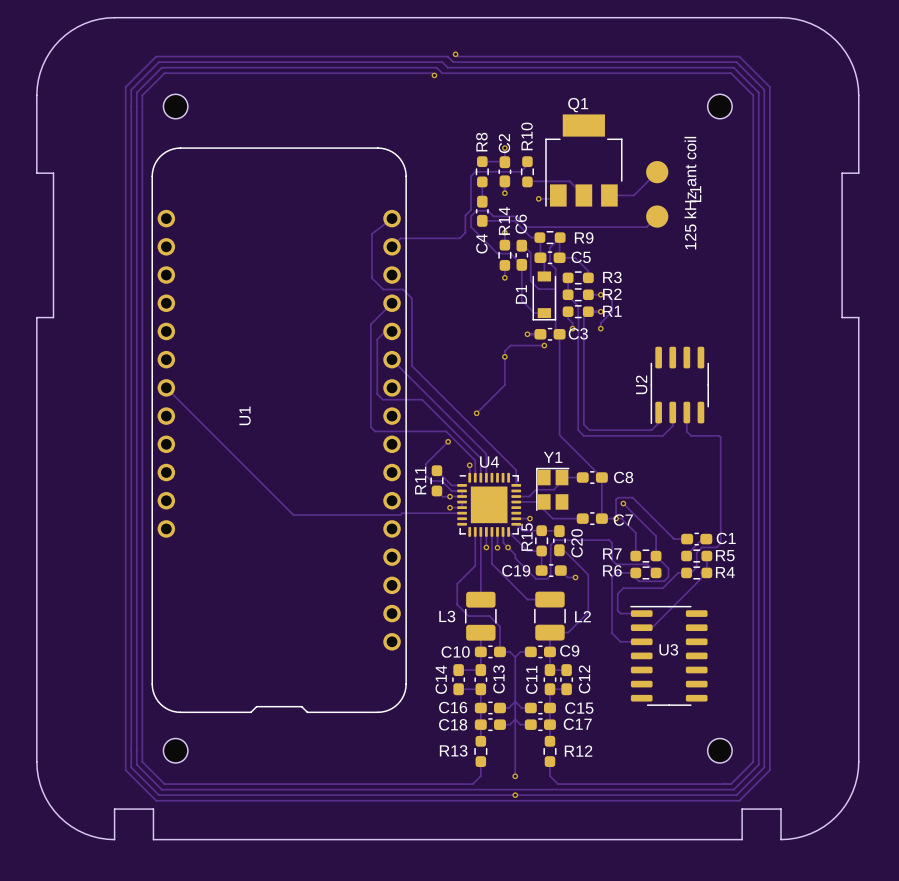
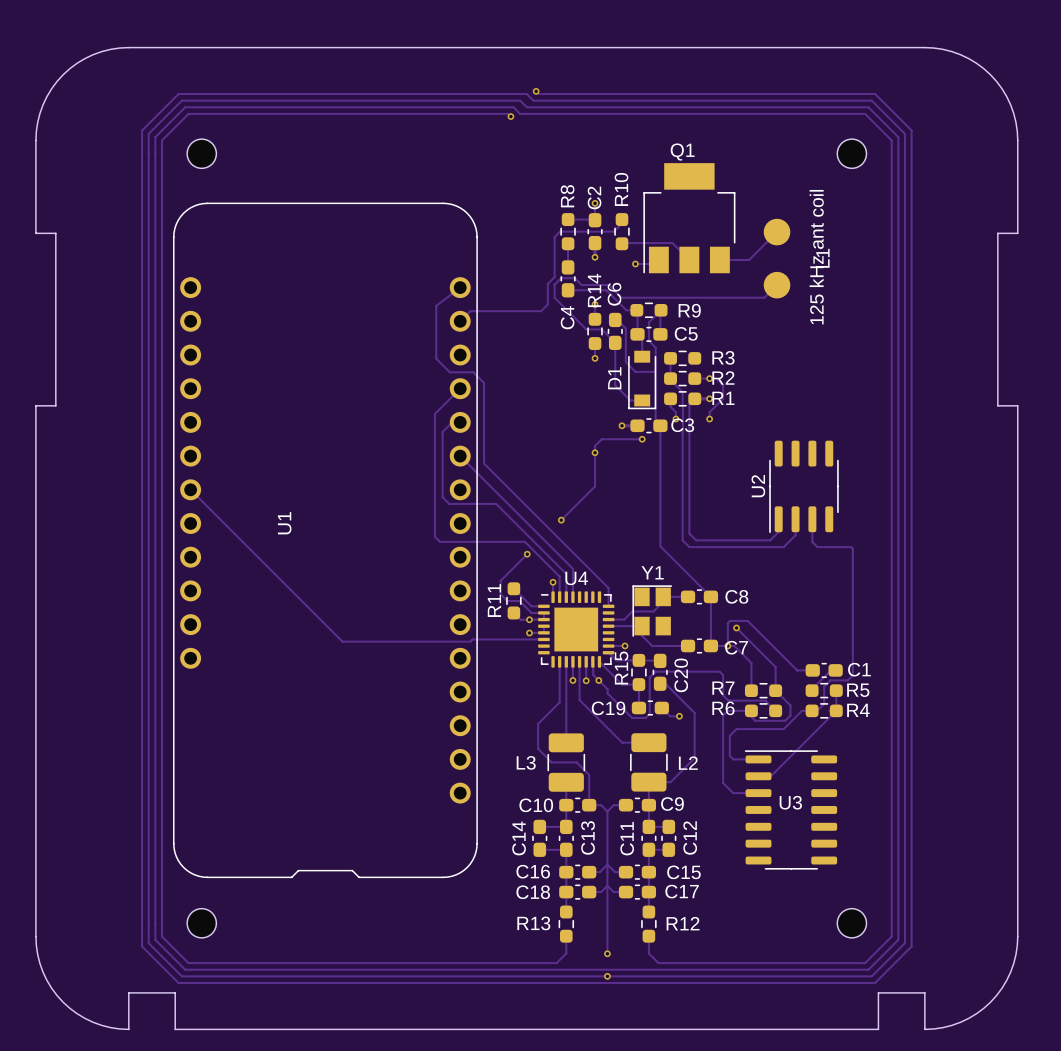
track: (559, 257) (575, 257) (588, 271) (588, 277) -> none

